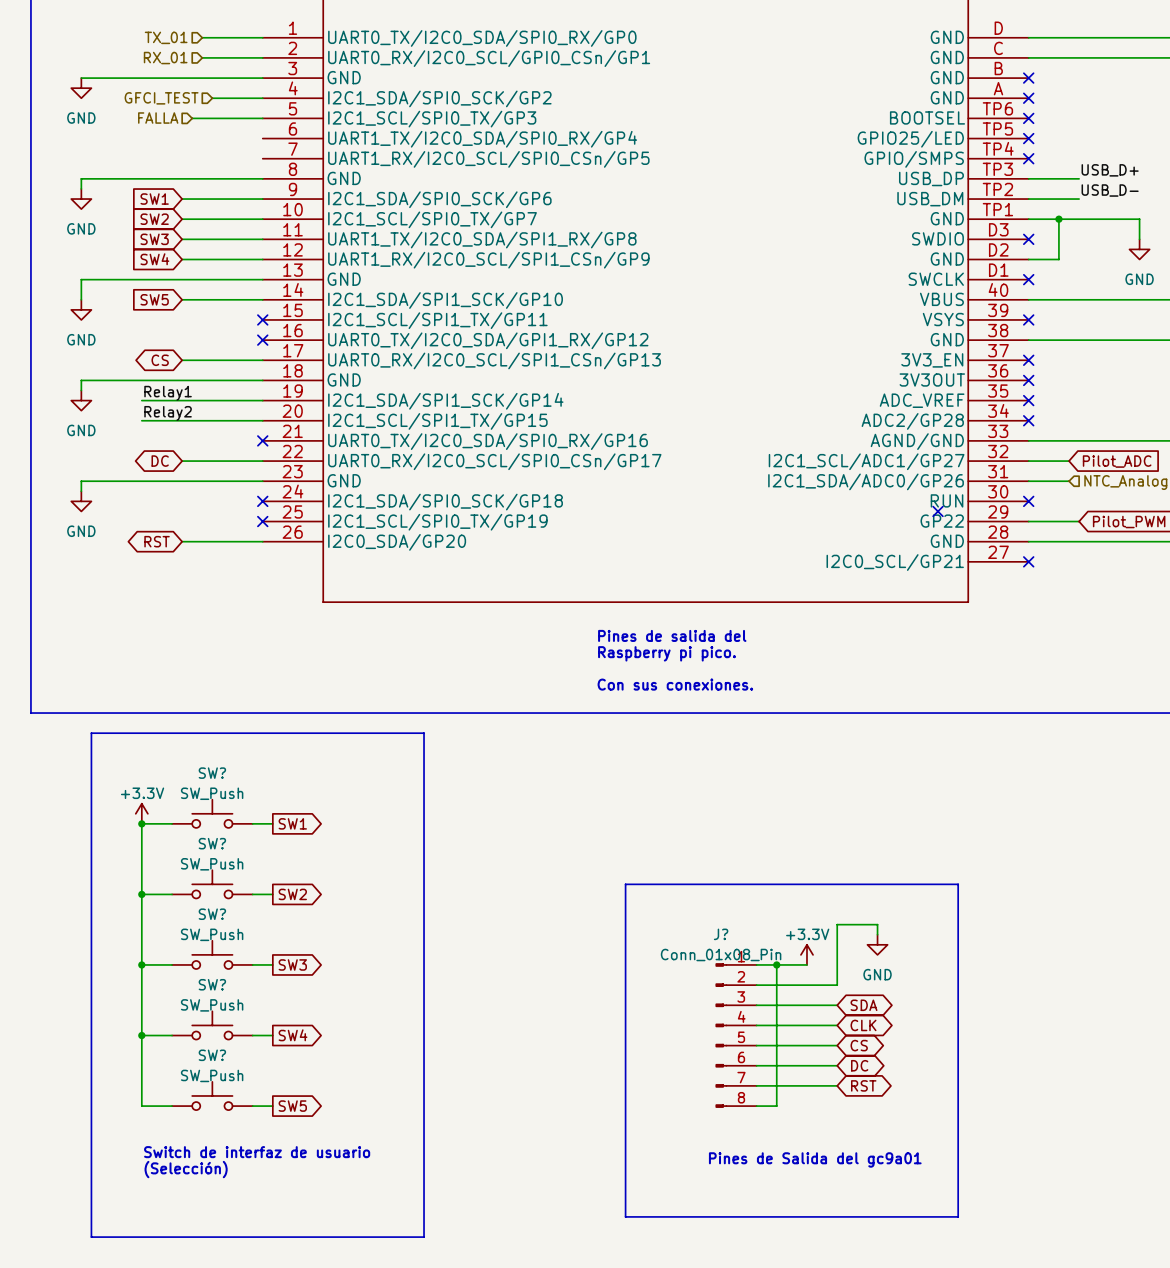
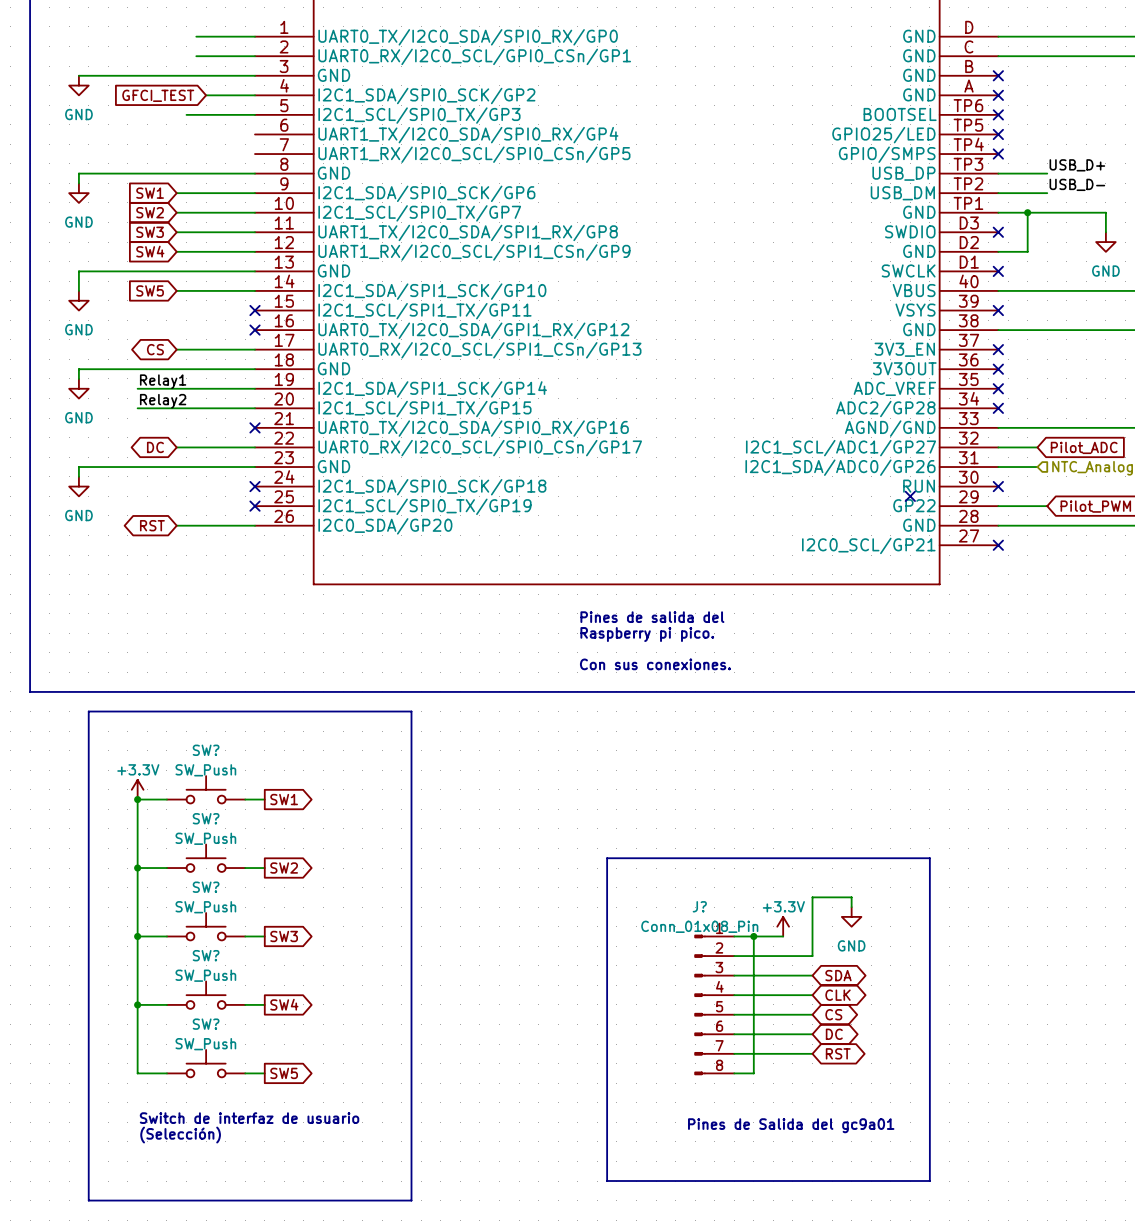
hierarchical label: TX_01 (166, 37) -> none
hierarchical label: RX_01 (165, 58) -> none
hierarchical label: GFCI_TEST (161, 98) -> none
global label: none -> GFCI_TEST (158, 95)
hierarchical label: FALLA (158, 118) -> none

